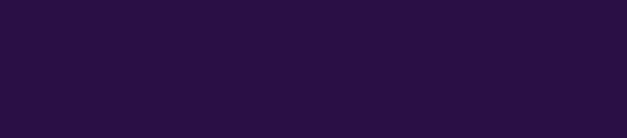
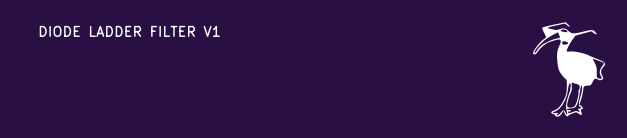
drawing: none -> [533, 22, 606, 117]
text: none -> DIODE LADDER FILTER V1 (129, 31)

